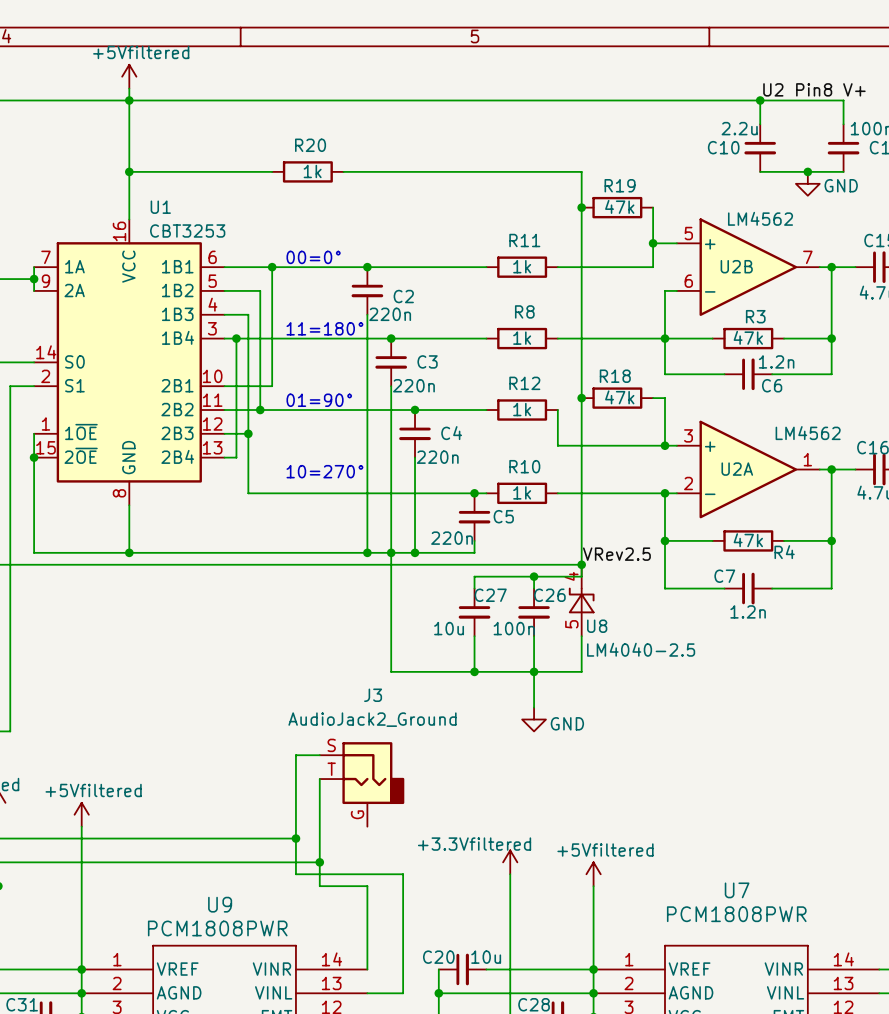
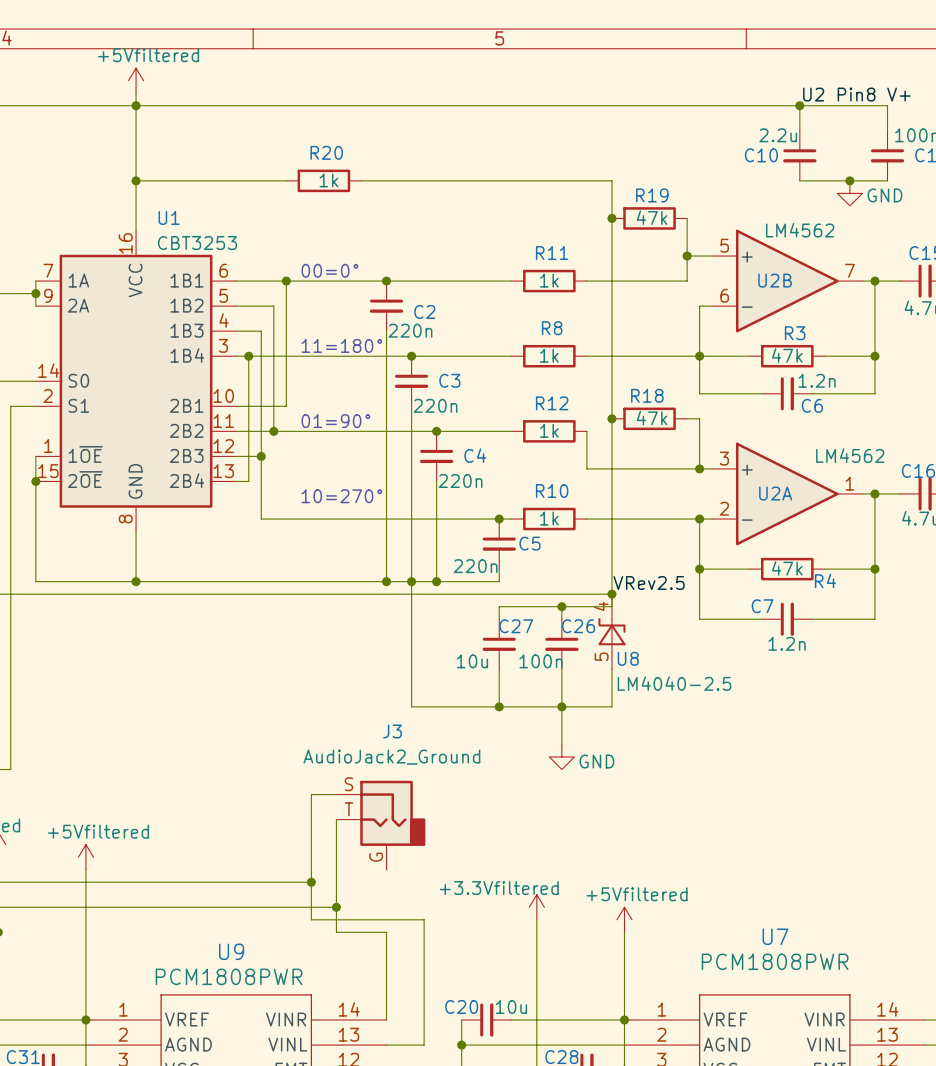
junction: (81, 993) -> none
junction: (593, 993) -> none

